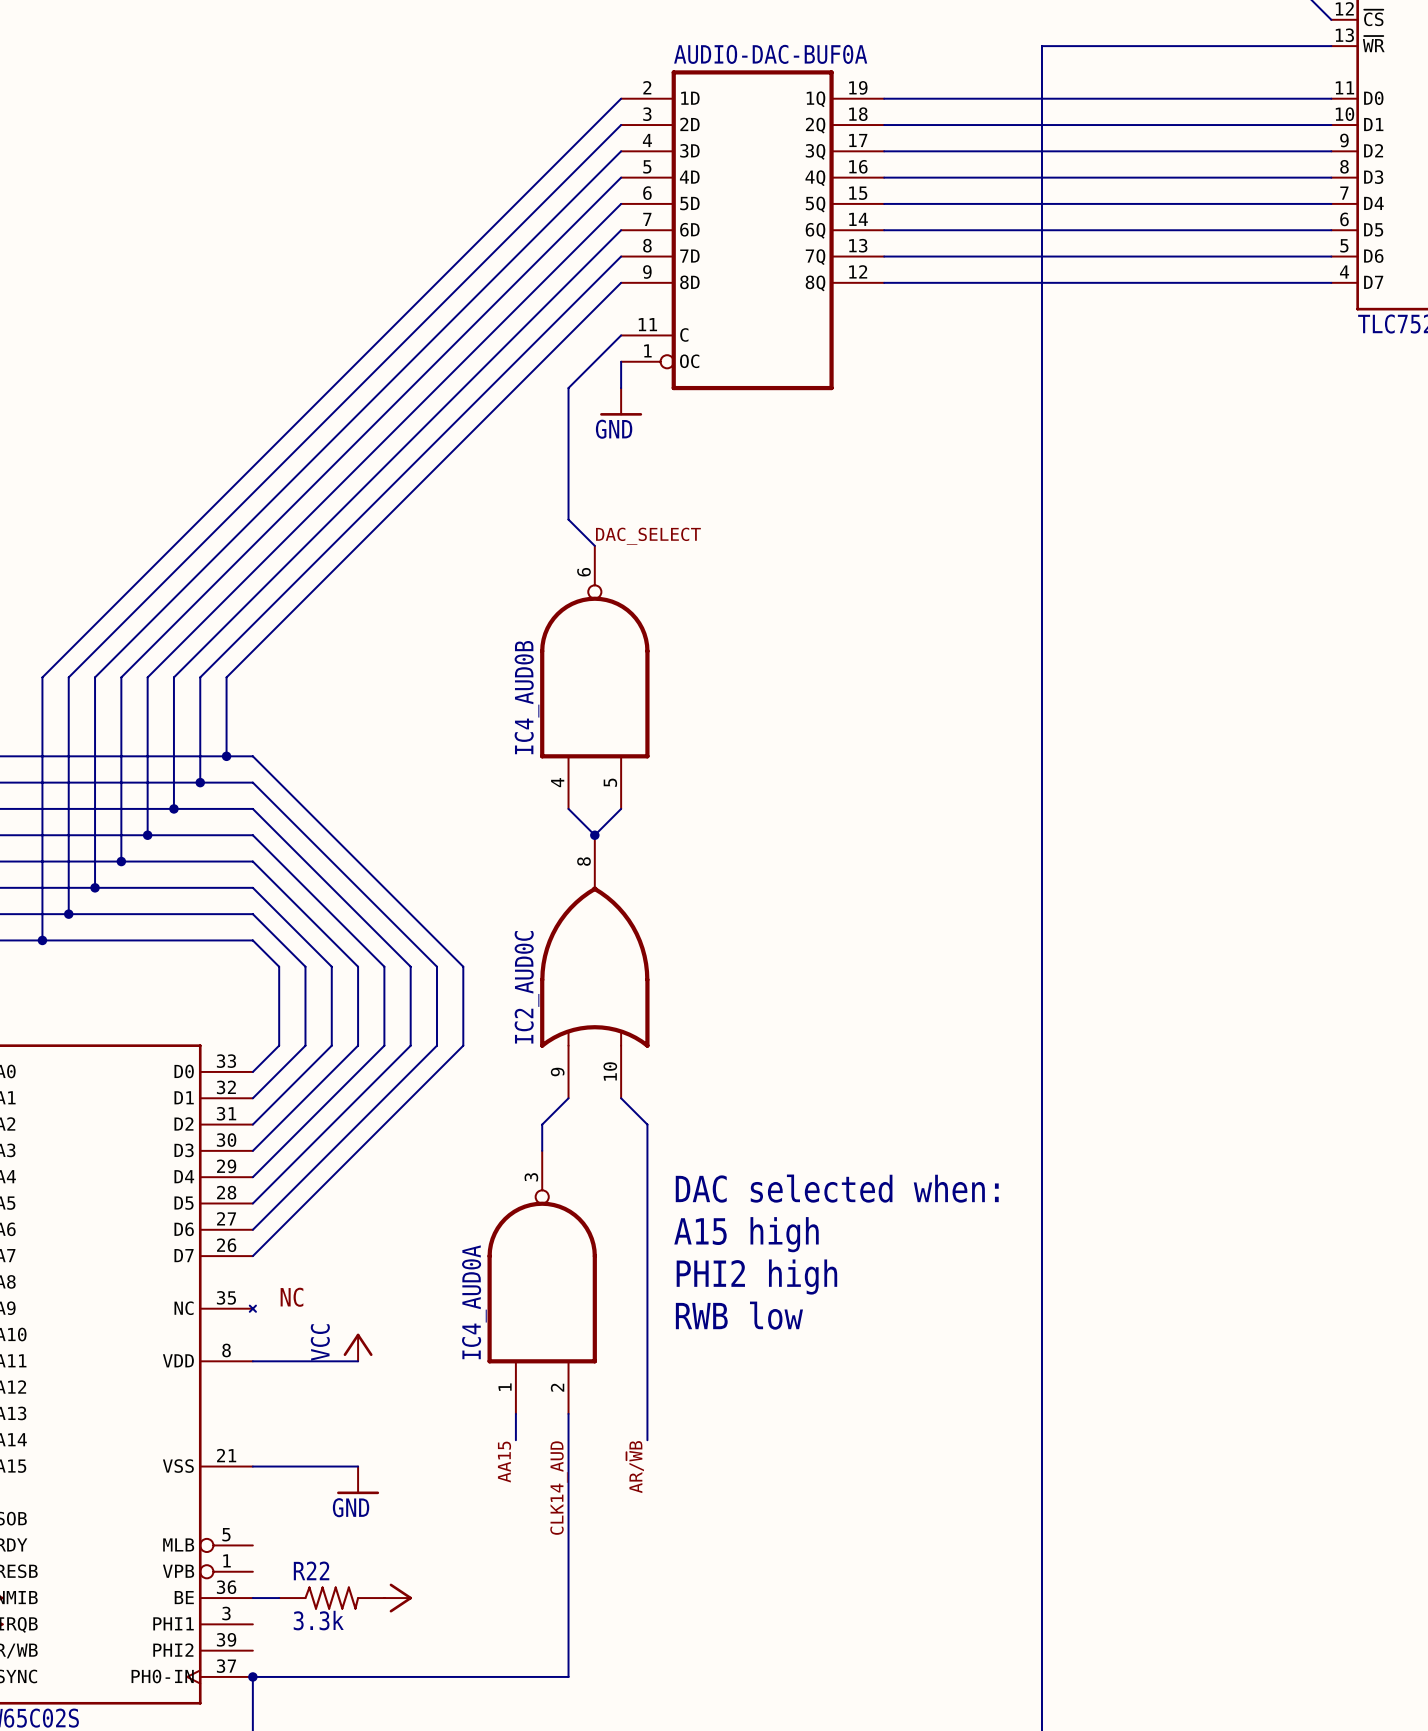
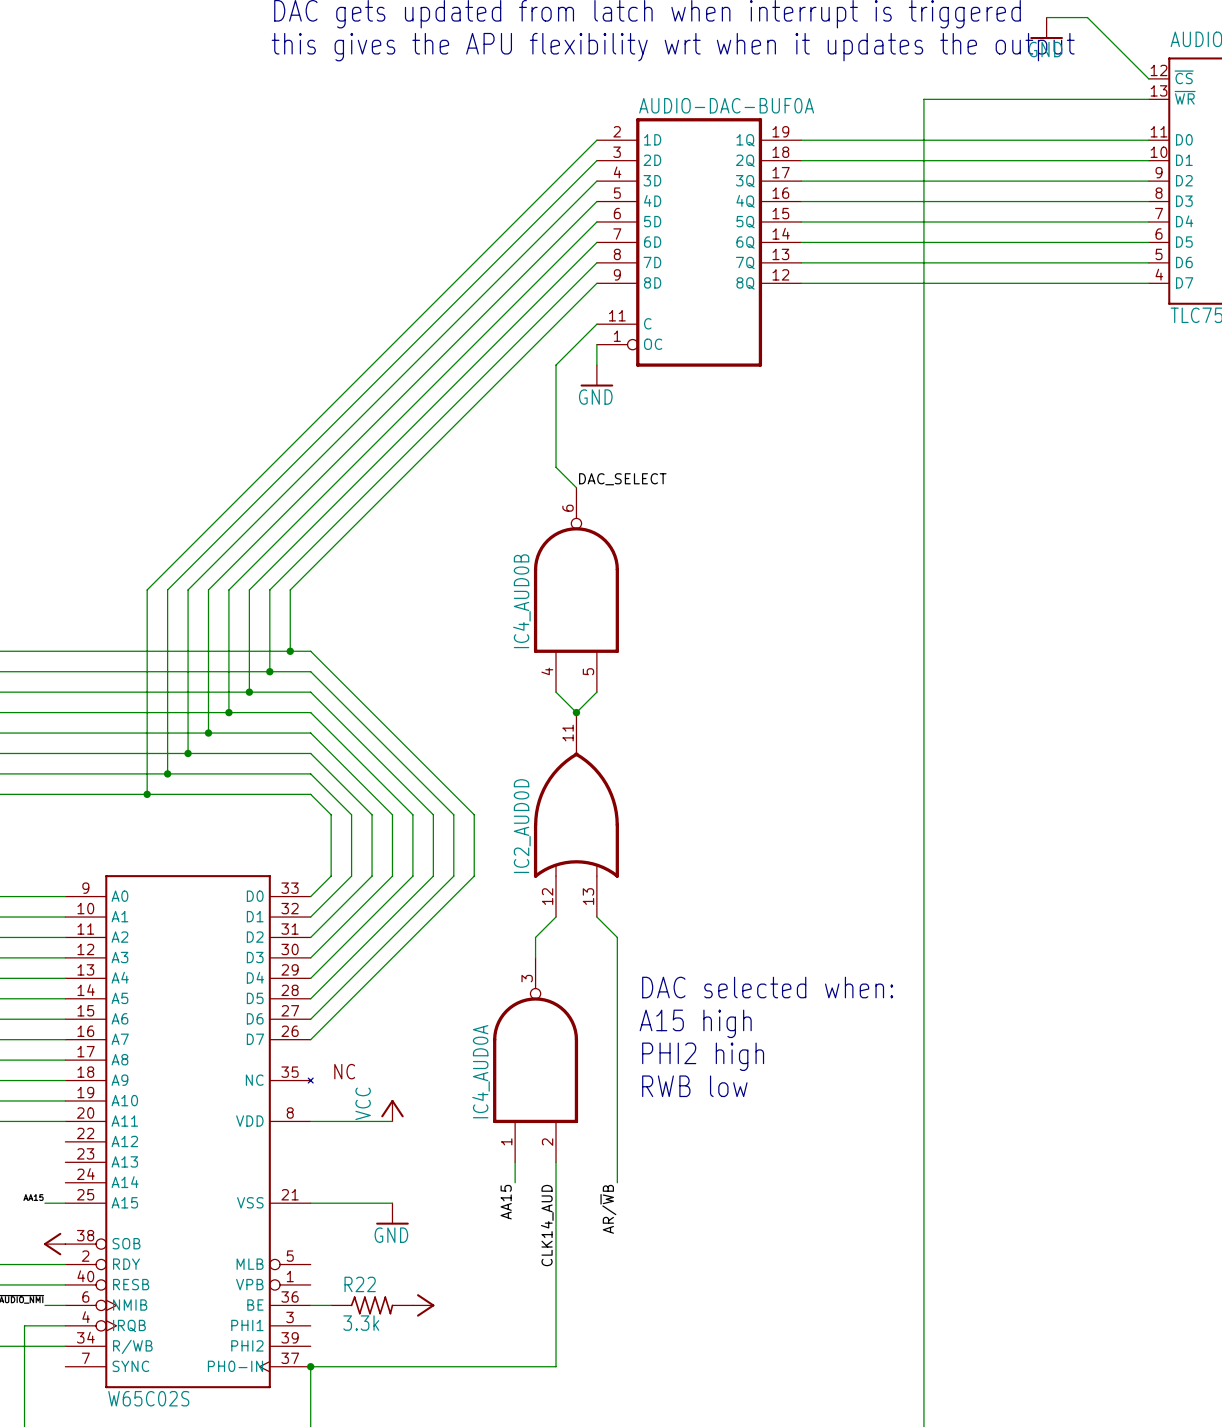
IC2_AUD0C pin number: 8 (583, 861) -> 11 (568, 733)
IC2_AUD0C name: IC2_AUD0C (526, 987) -> IC2_AUD0D (522, 826)
IC2_AUD0C pin number: 10 (610, 1071) -> 13 (588, 896)
IC2_AUD0C pin number: 9 (557, 1072) -> 12 (547, 896)

